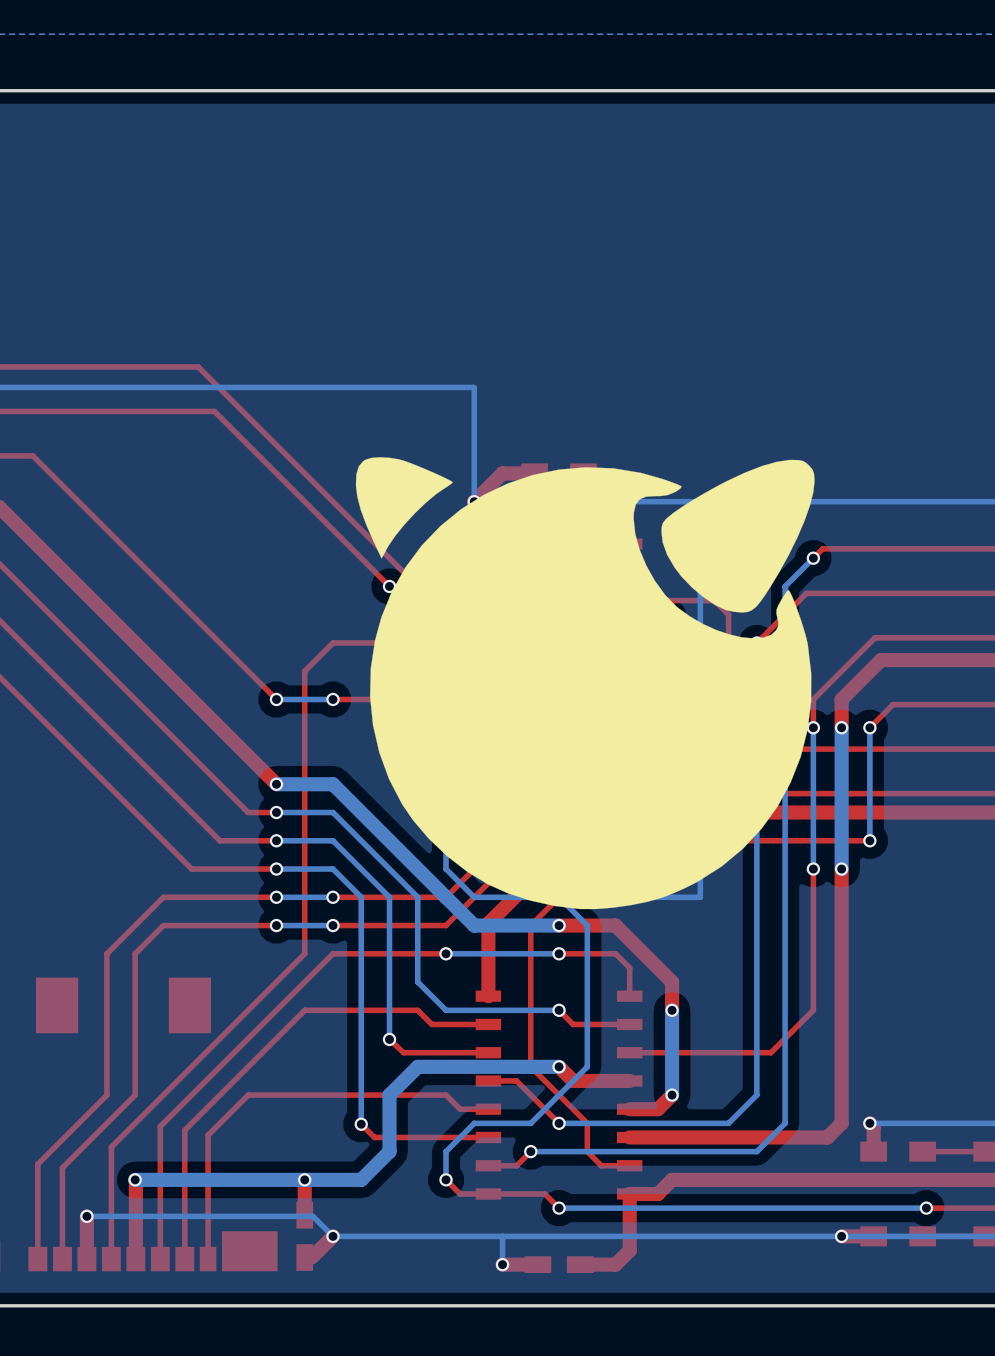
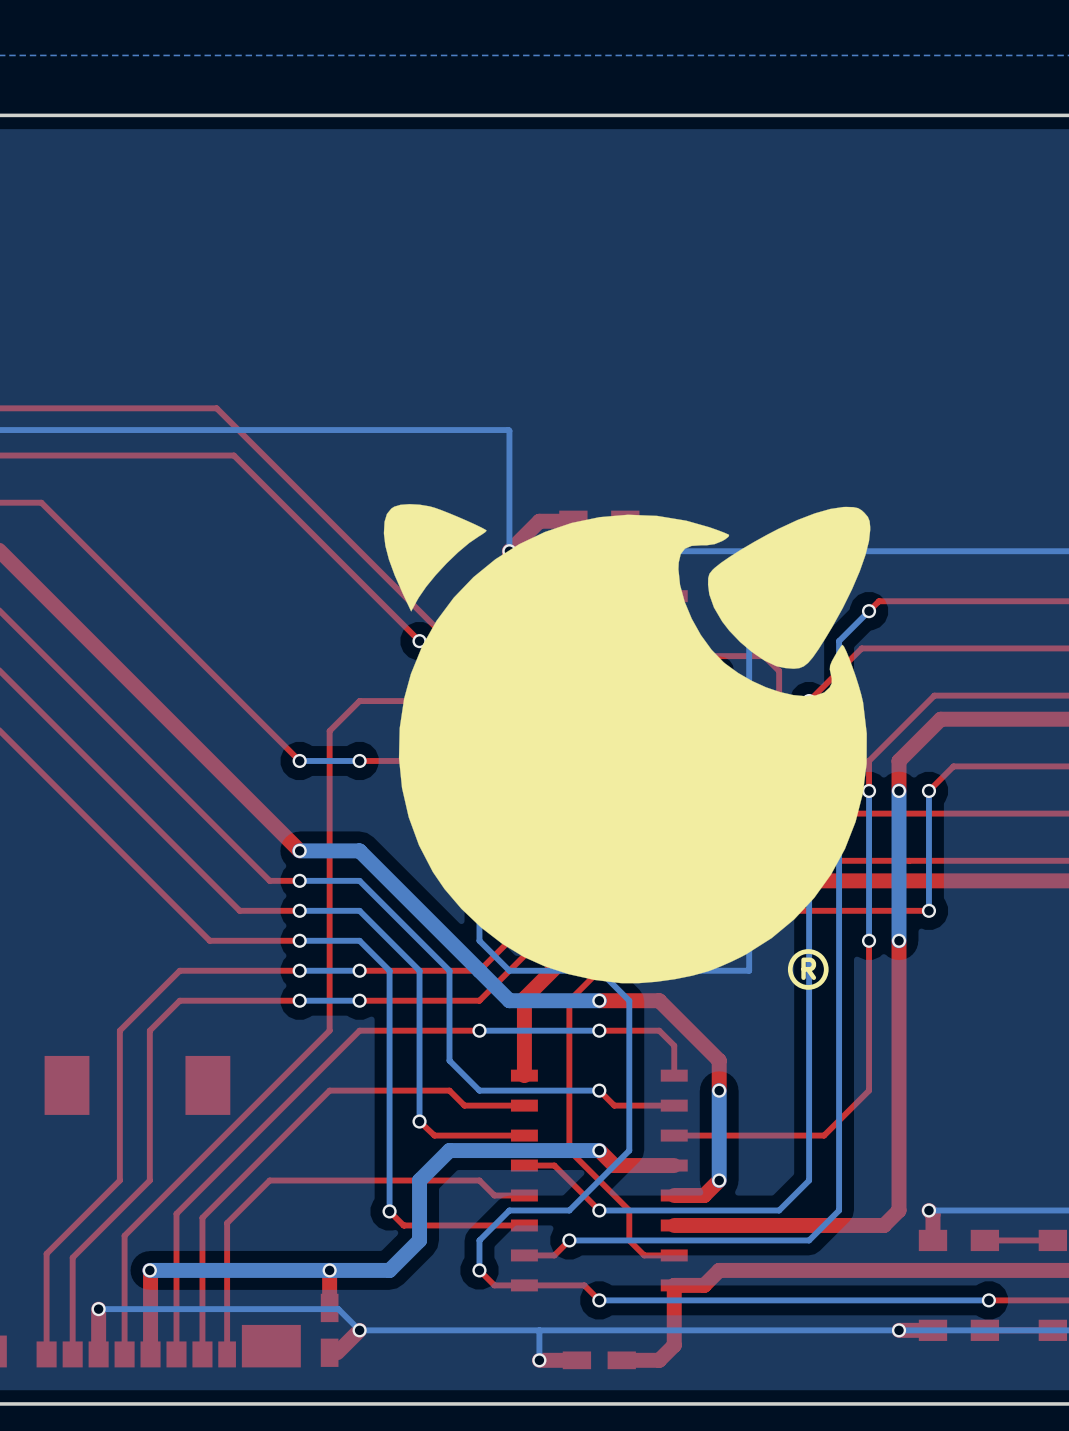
drawing: none -> [787, 949, 829, 990]
text: none -> R (808, 968)

